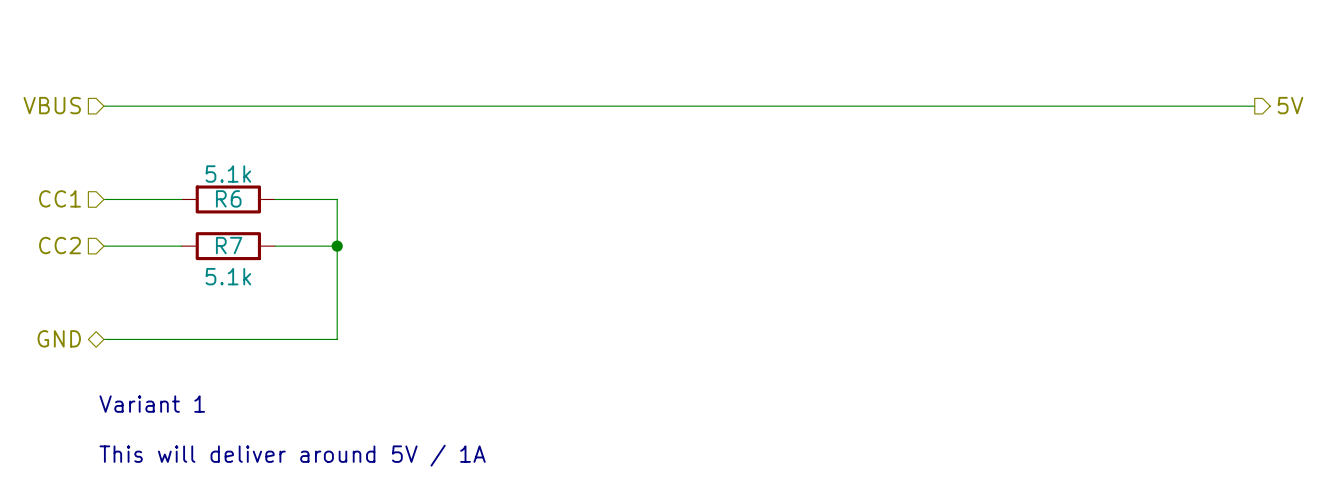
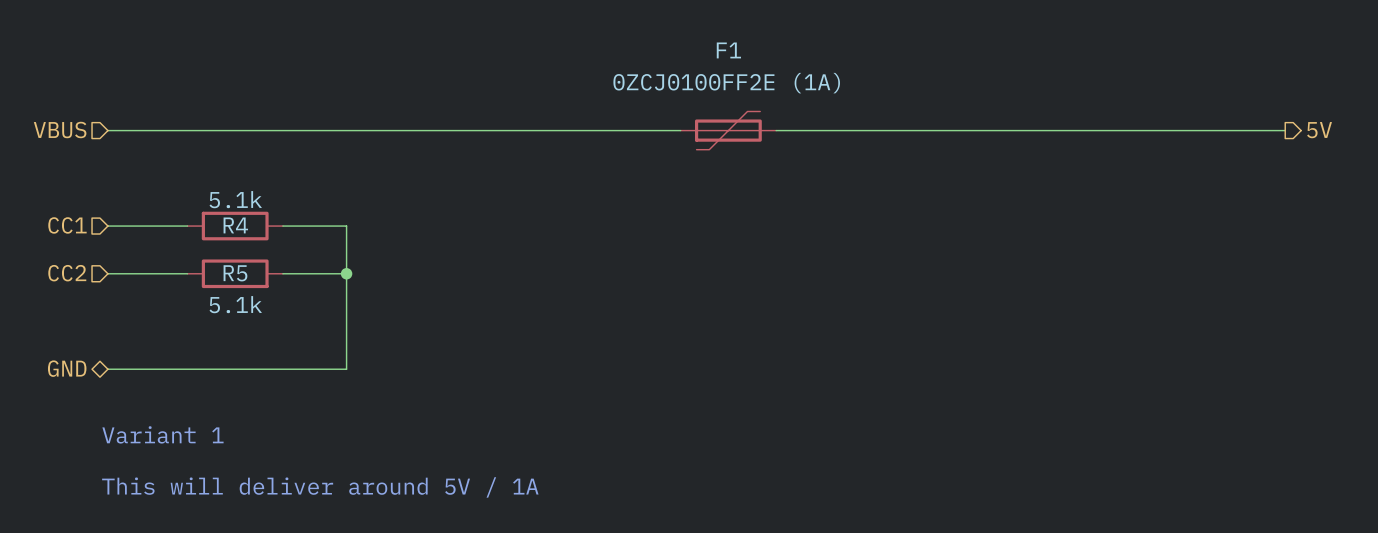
F1: none -> 0ZCJ0100FF2E (1A) (728, 130)
R6 name: R6 (228, 198) -> R4 (235, 225)
R7 name: R7 (229, 245) -> R5 (235, 273)

